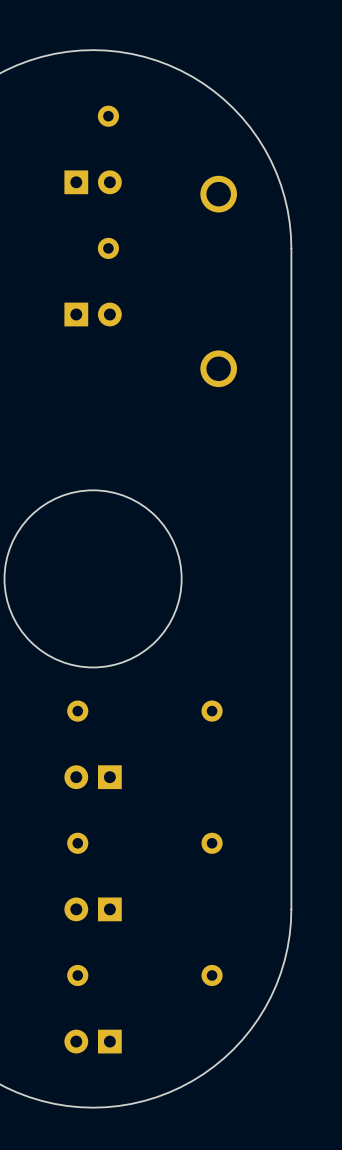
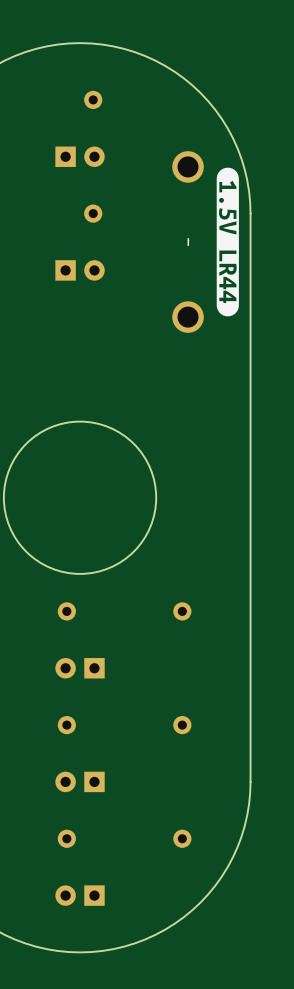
drawing: none -> [216, 167, 239, 317]
text: none -> - (188, 242)

